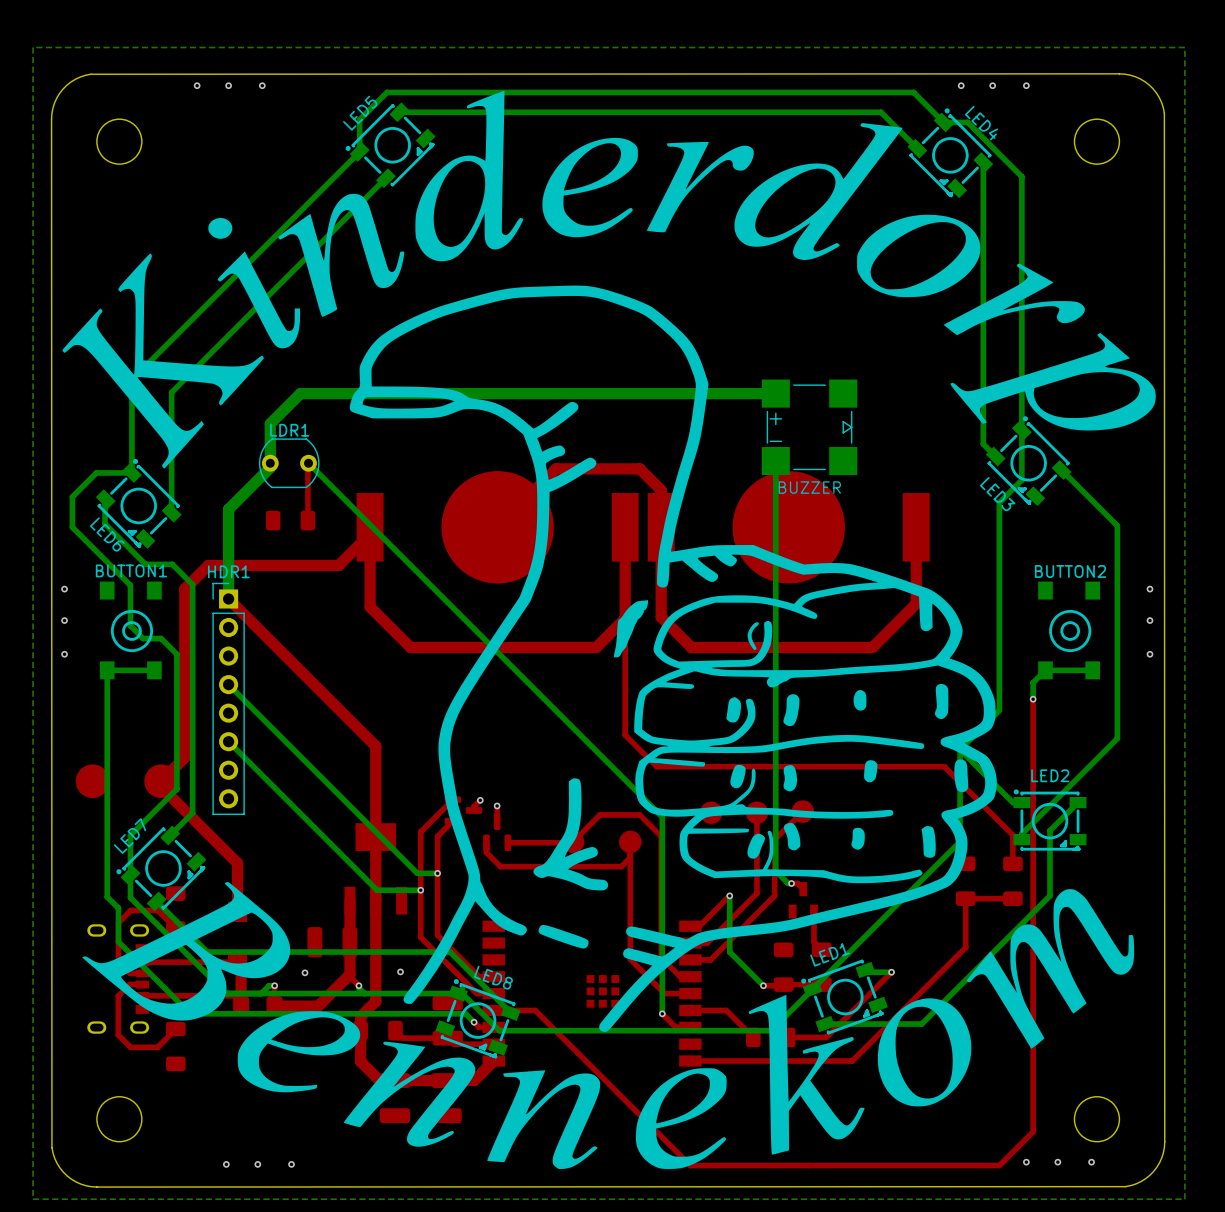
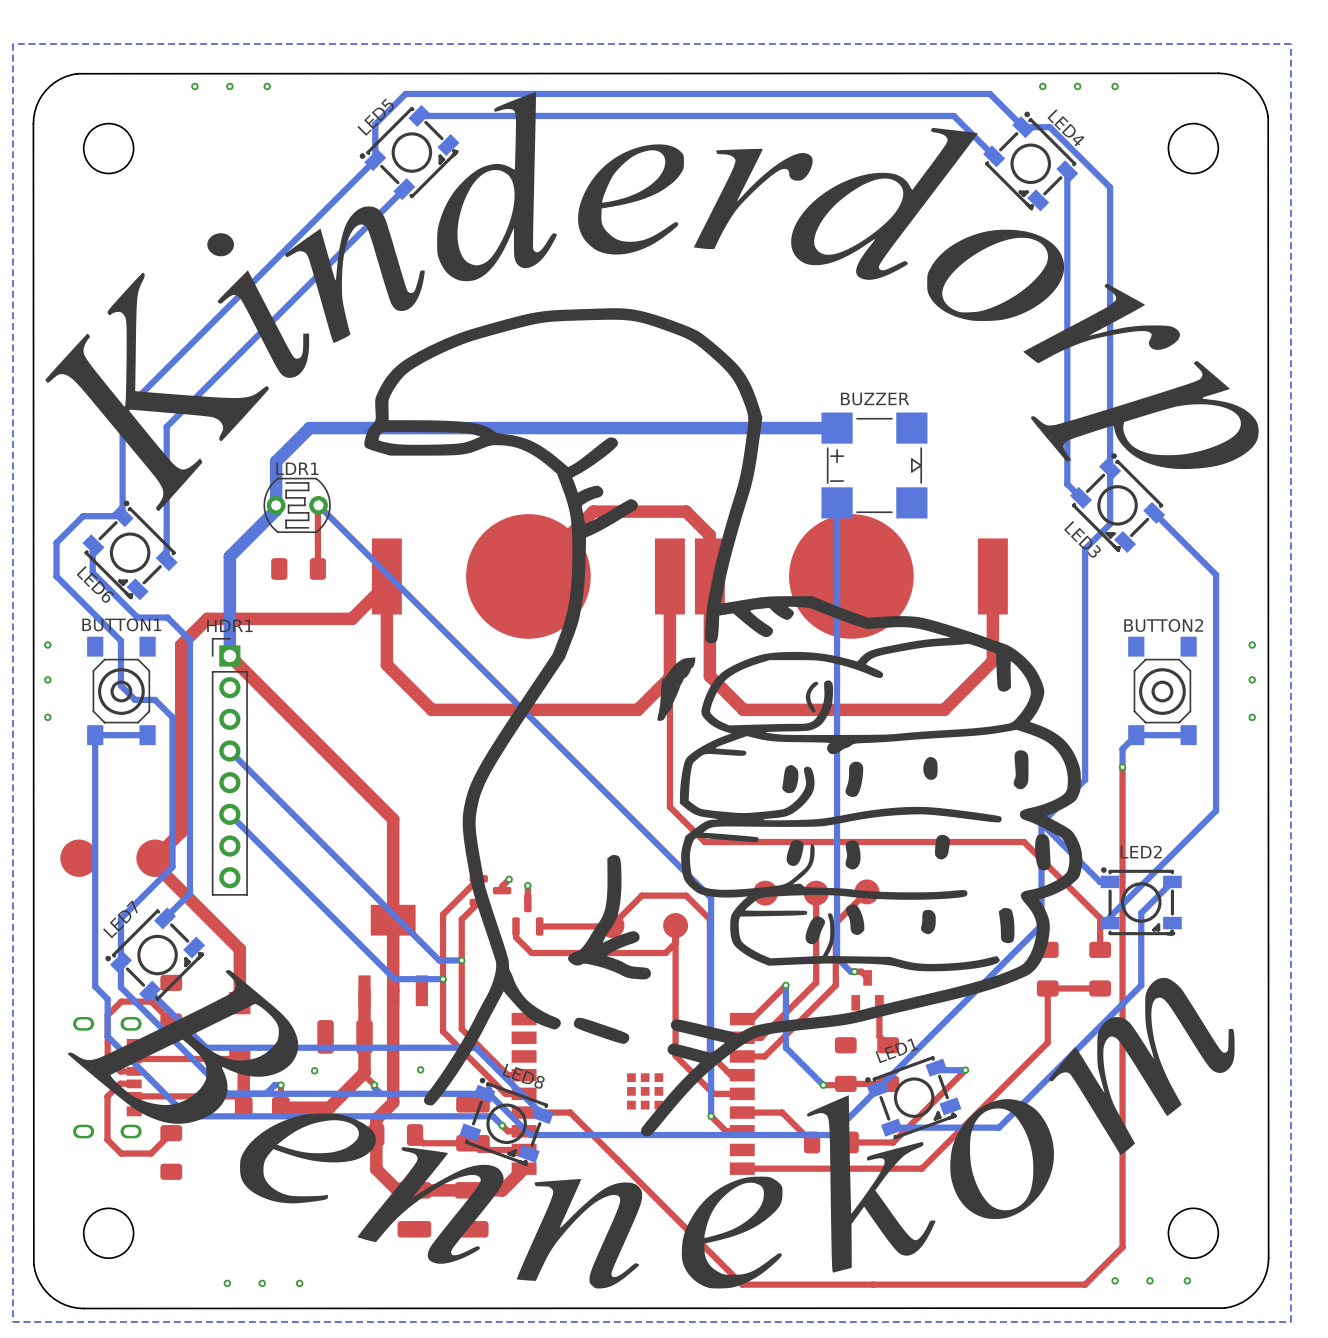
LDR1 footprint: [258, 438, 320, 489] -> [263, 477, 331, 533]
part text position: BUZZER (809, 487) -> BUZZER (875, 399)
BUTTON1 footprint: [99, 581, 162, 680] -> [87, 636, 156, 746]
BUTTON2 footprint: [1038, 581, 1100, 680] -> [1128, 636, 1197, 746]

